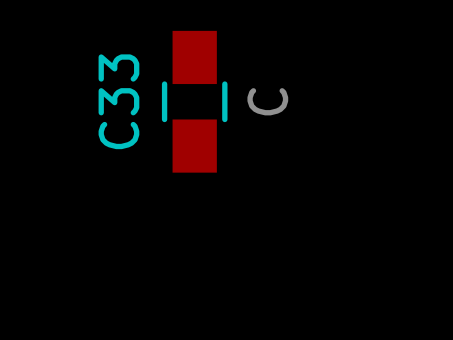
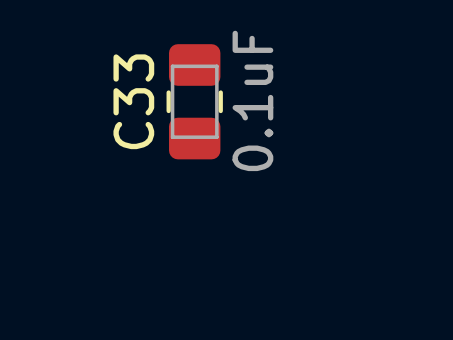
C33 footprint: [161, 30, 228, 173] -> [166, 44, 223, 160]
C33 value: C (267, 101) -> 0.1uF (252, 100)

